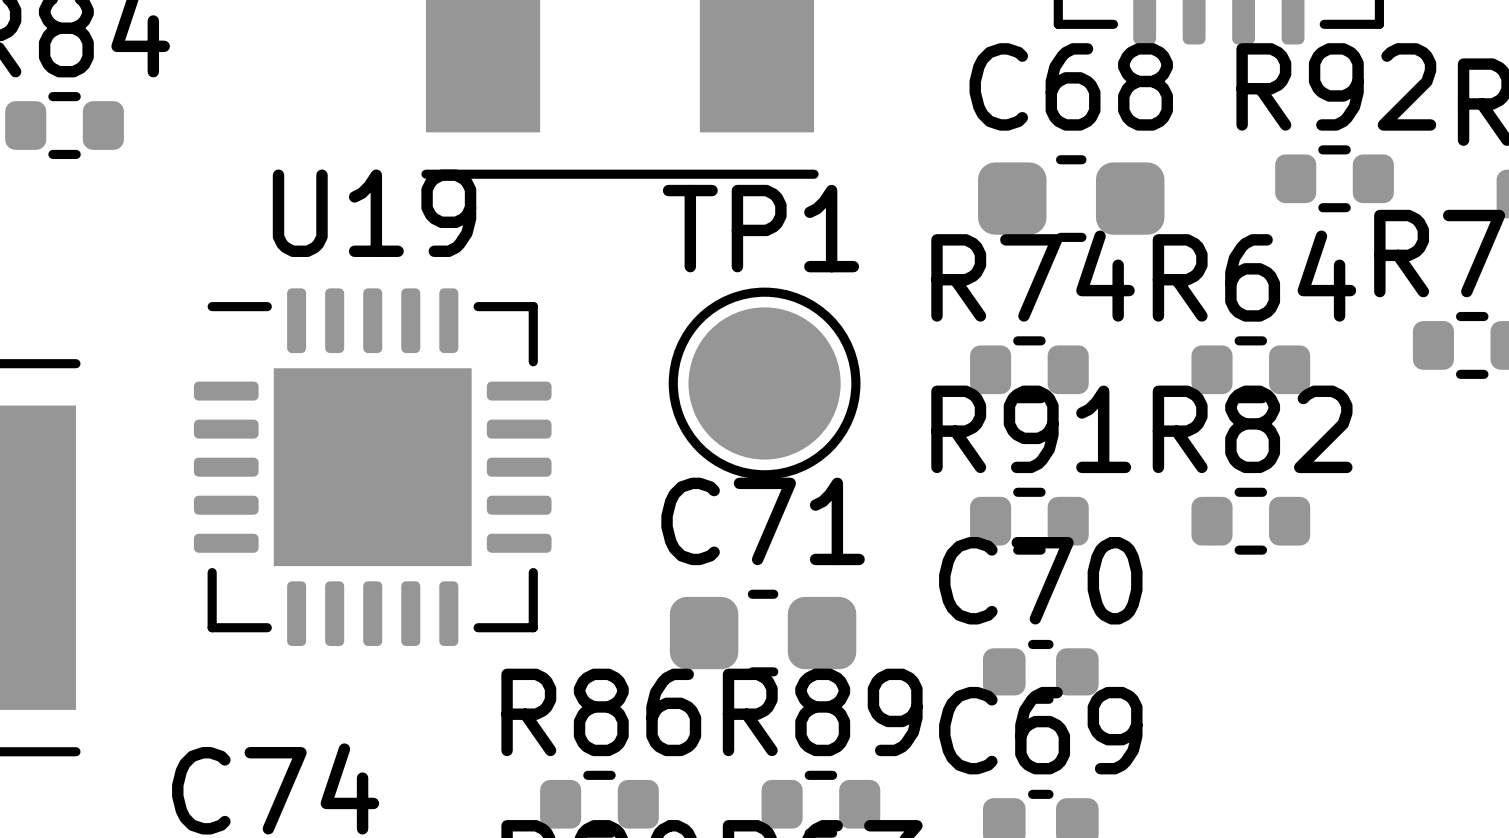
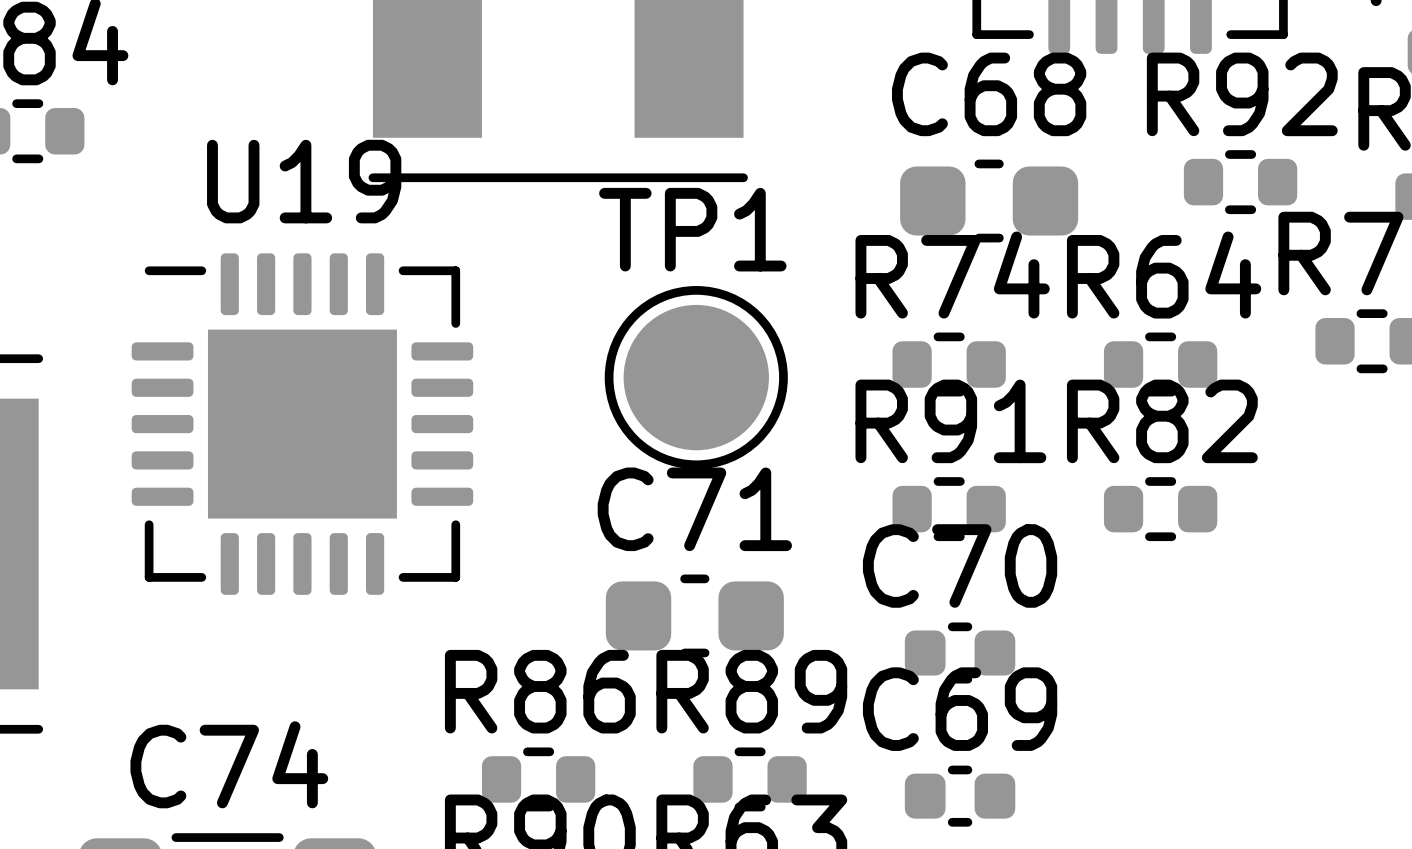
U19 position: (372, 467) -> (302, 424)

